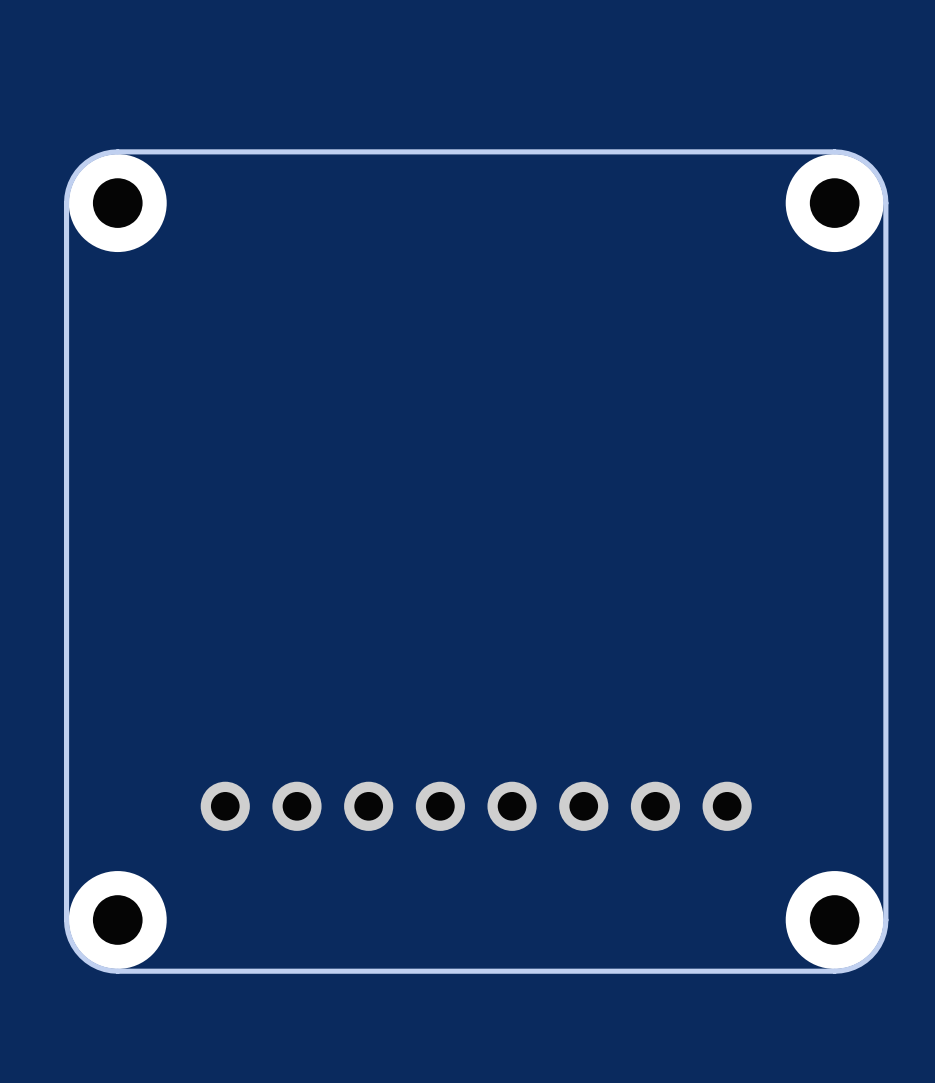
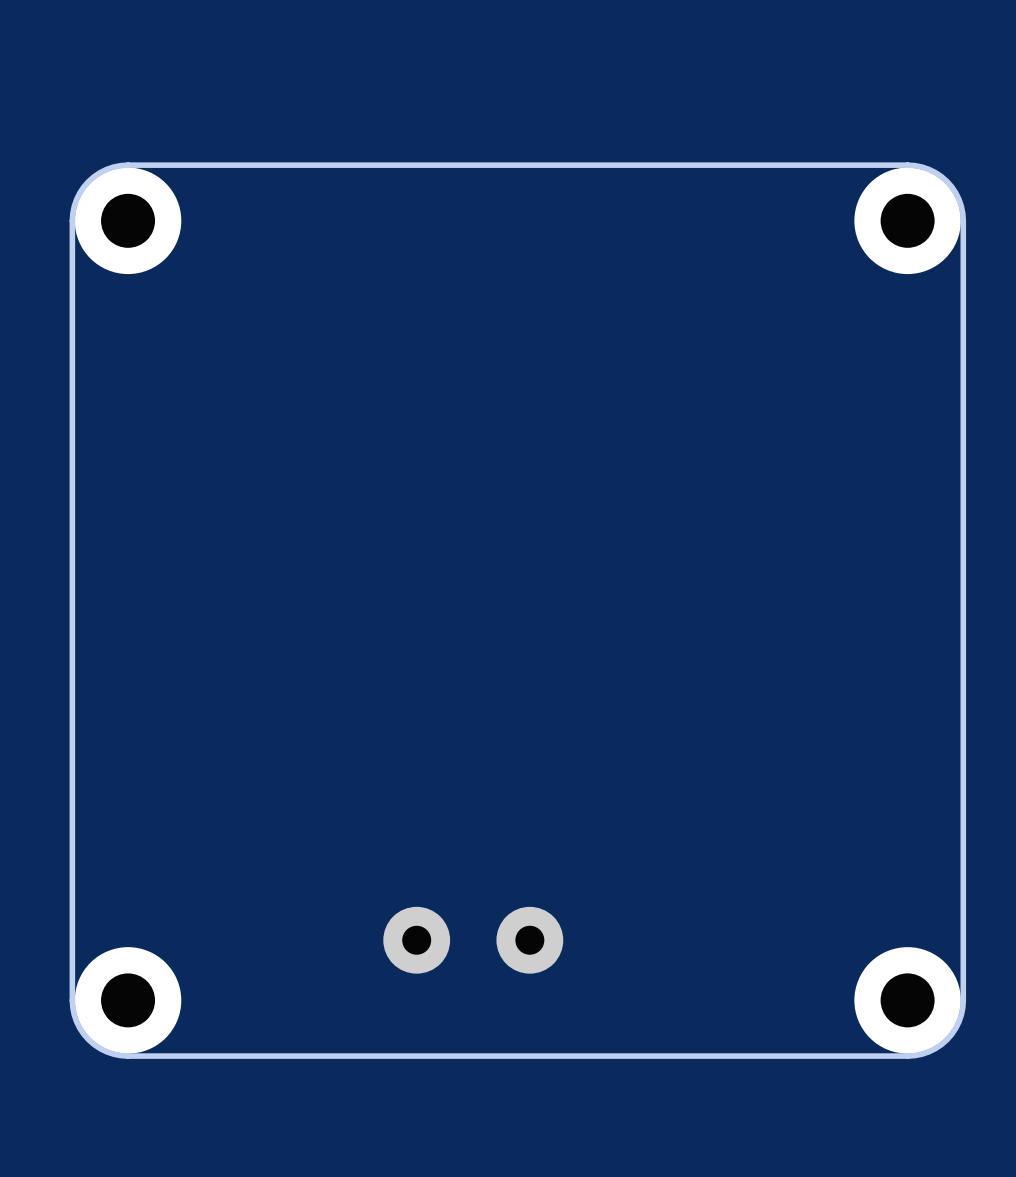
part: (476, 806) -> none
part: none -> (473, 940)

